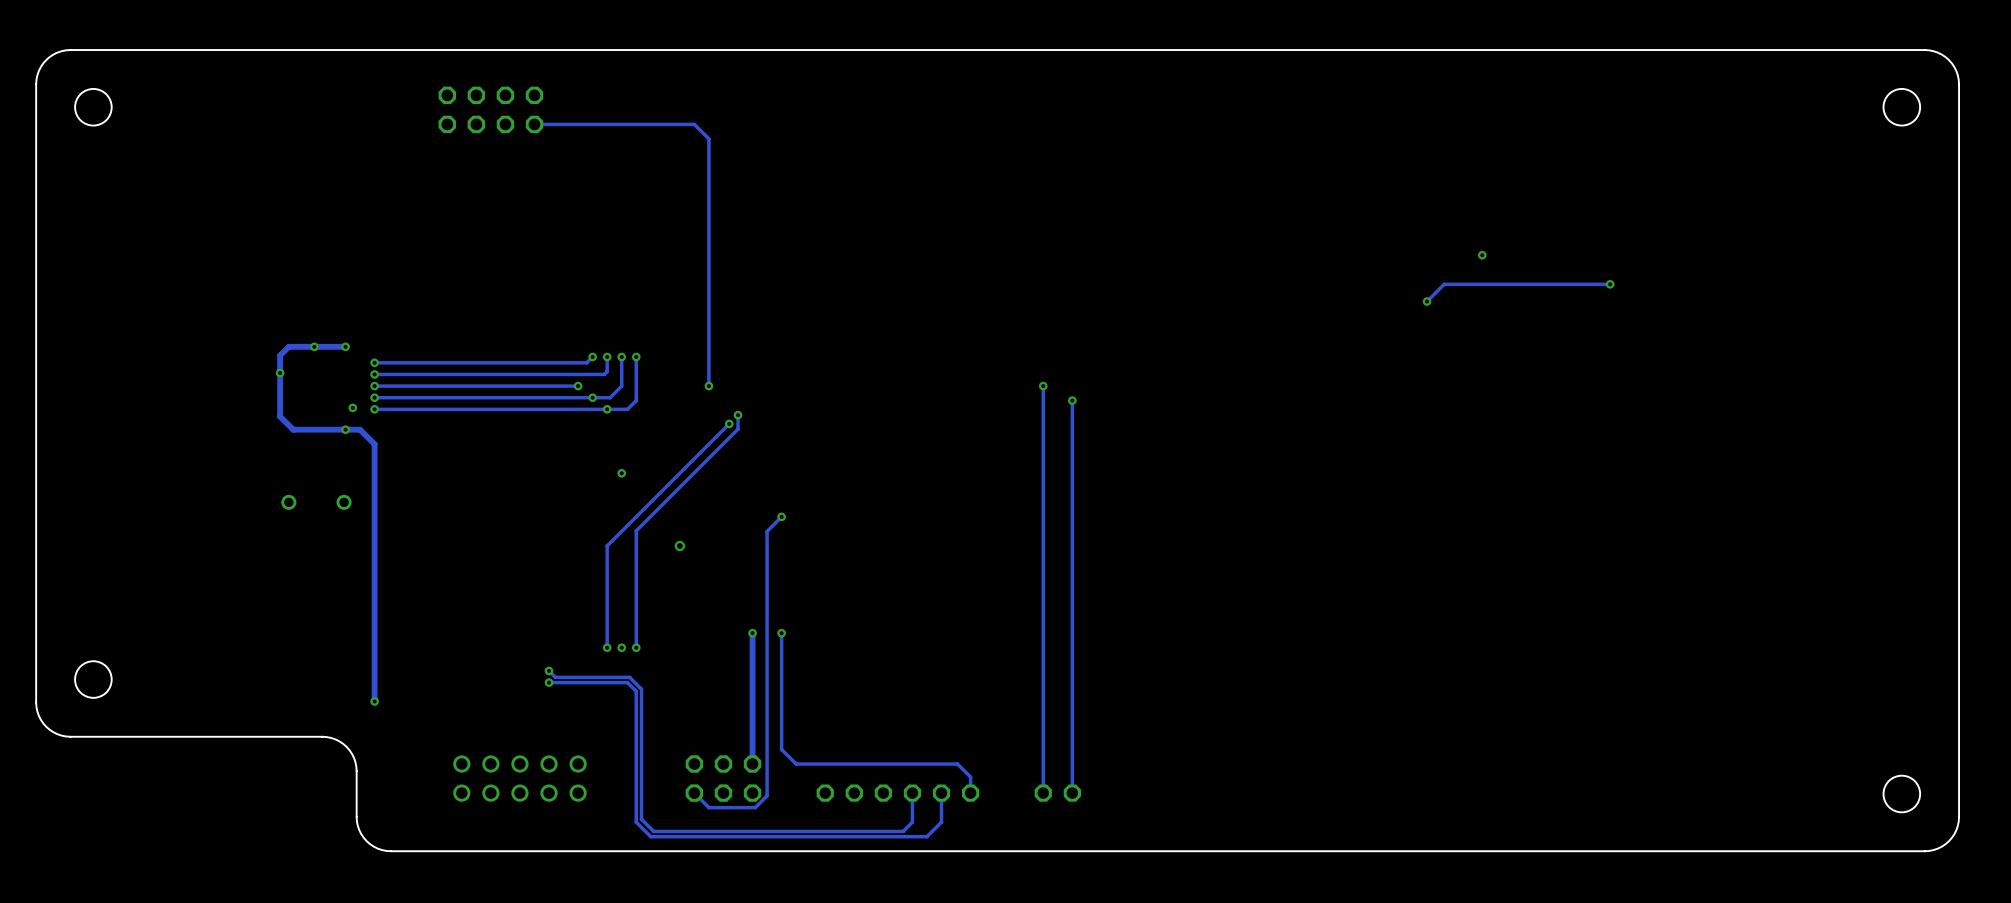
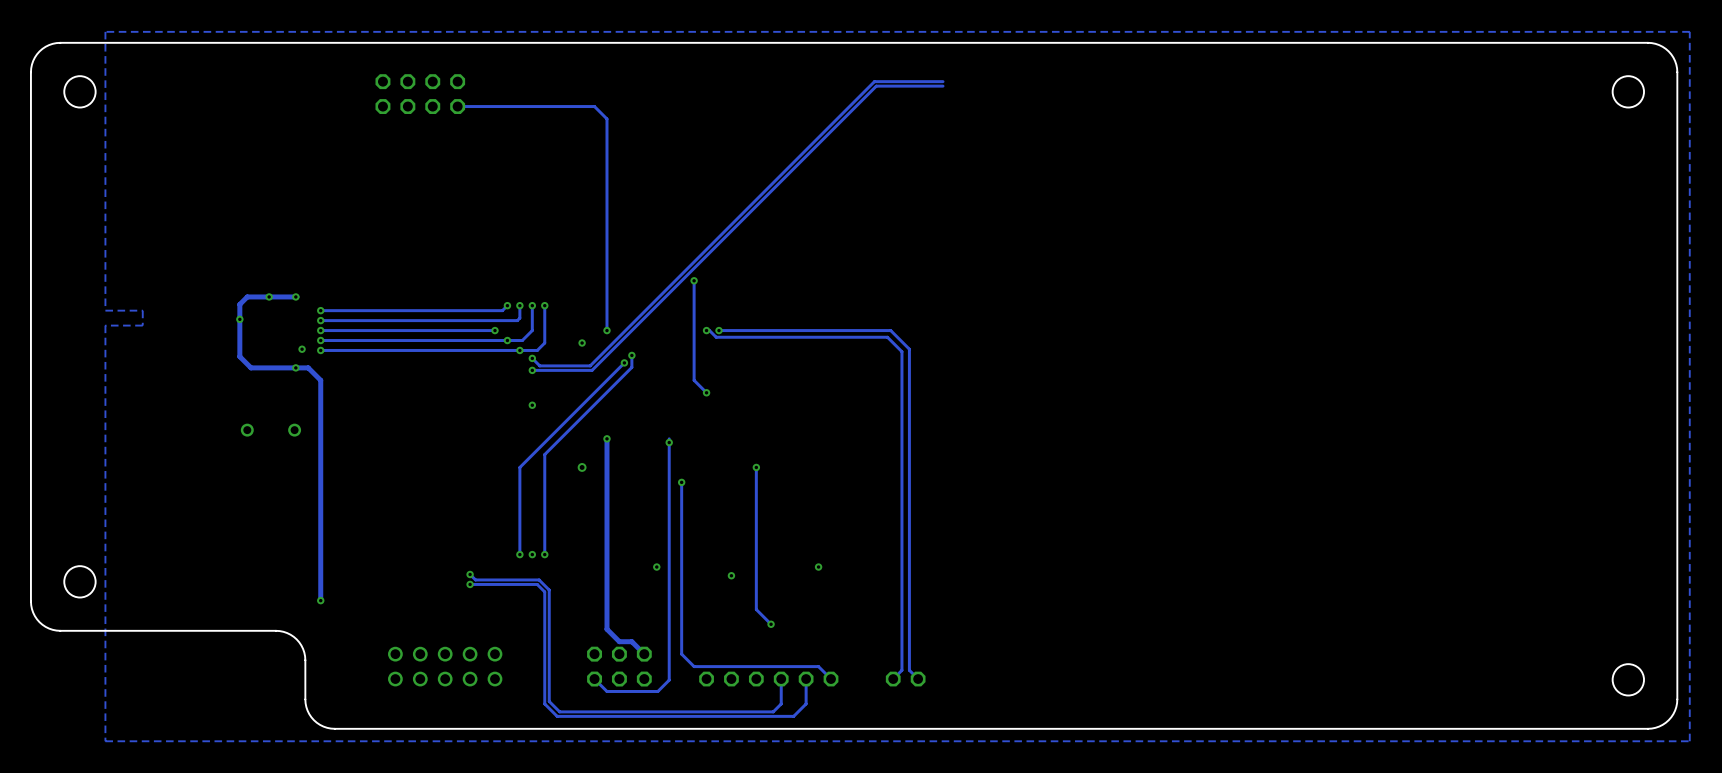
zone outline: none -> (1689, 31) (1689, 741) (105, 741) (105, 325) (142, 325) (142, 310) (105, 310) (105, 31) (1689, 31)
track: none -> (943, 81) (874, 81) (590, 365) (539, 365) (532, 358)
track: none -> (943, 86) (876, 86) (592, 370) (532, 370)
via: (1482, 255) -> none
track: (1610, 284) (1444, 284) (1427, 301) -> none
via: (1610, 284) -> none
via: (1427, 301) -> none
track: none -> (694, 280) (694, 380) (706, 392)
via: none -> (694, 280)
via: none -> (706, 330)
via: none -> (719, 330)
track: (1043, 386) (1043, 793) -> (706, 330) (709, 330) (716, 337) (887, 337) (901, 351) (901, 670) (893, 679)
via: (1043, 386) -> none
via: none -> (582, 343)
track: (1072, 400) (1072, 793) -> (719, 330) (890, 330) (909, 349) (909, 670) (918, 679)
via: (1072, 400) -> none
via: none -> (532, 358)
via: none -> (532, 370)
via: none -> (706, 392)
via: none -> (606, 438)
track: none -> (669, 438) (669, 542)
track: (781, 516) (767, 531) (767, 795) (755, 807) -> (669, 641) (669, 680) (657, 691) (646, 691)
track: none -> (756, 467) (756, 609) (771, 624)
via: none -> (756, 467)
via: none -> (681, 482)
track: (752, 633) (752, 764) -> (606, 438) (606, 629) (619, 641) (631, 641) (644, 654)
via: (752, 633) -> none
via: (781, 633) -> none
via: none -> (656, 567)
via: none -> (818, 567)
via: none -> (731, 575)
via: none -> (771, 624)
track: (781, 749) (796, 764) (957, 764) (970, 777) (970, 793) -> (681, 482) (681, 654) (694, 666) (818, 666) (831, 679)

